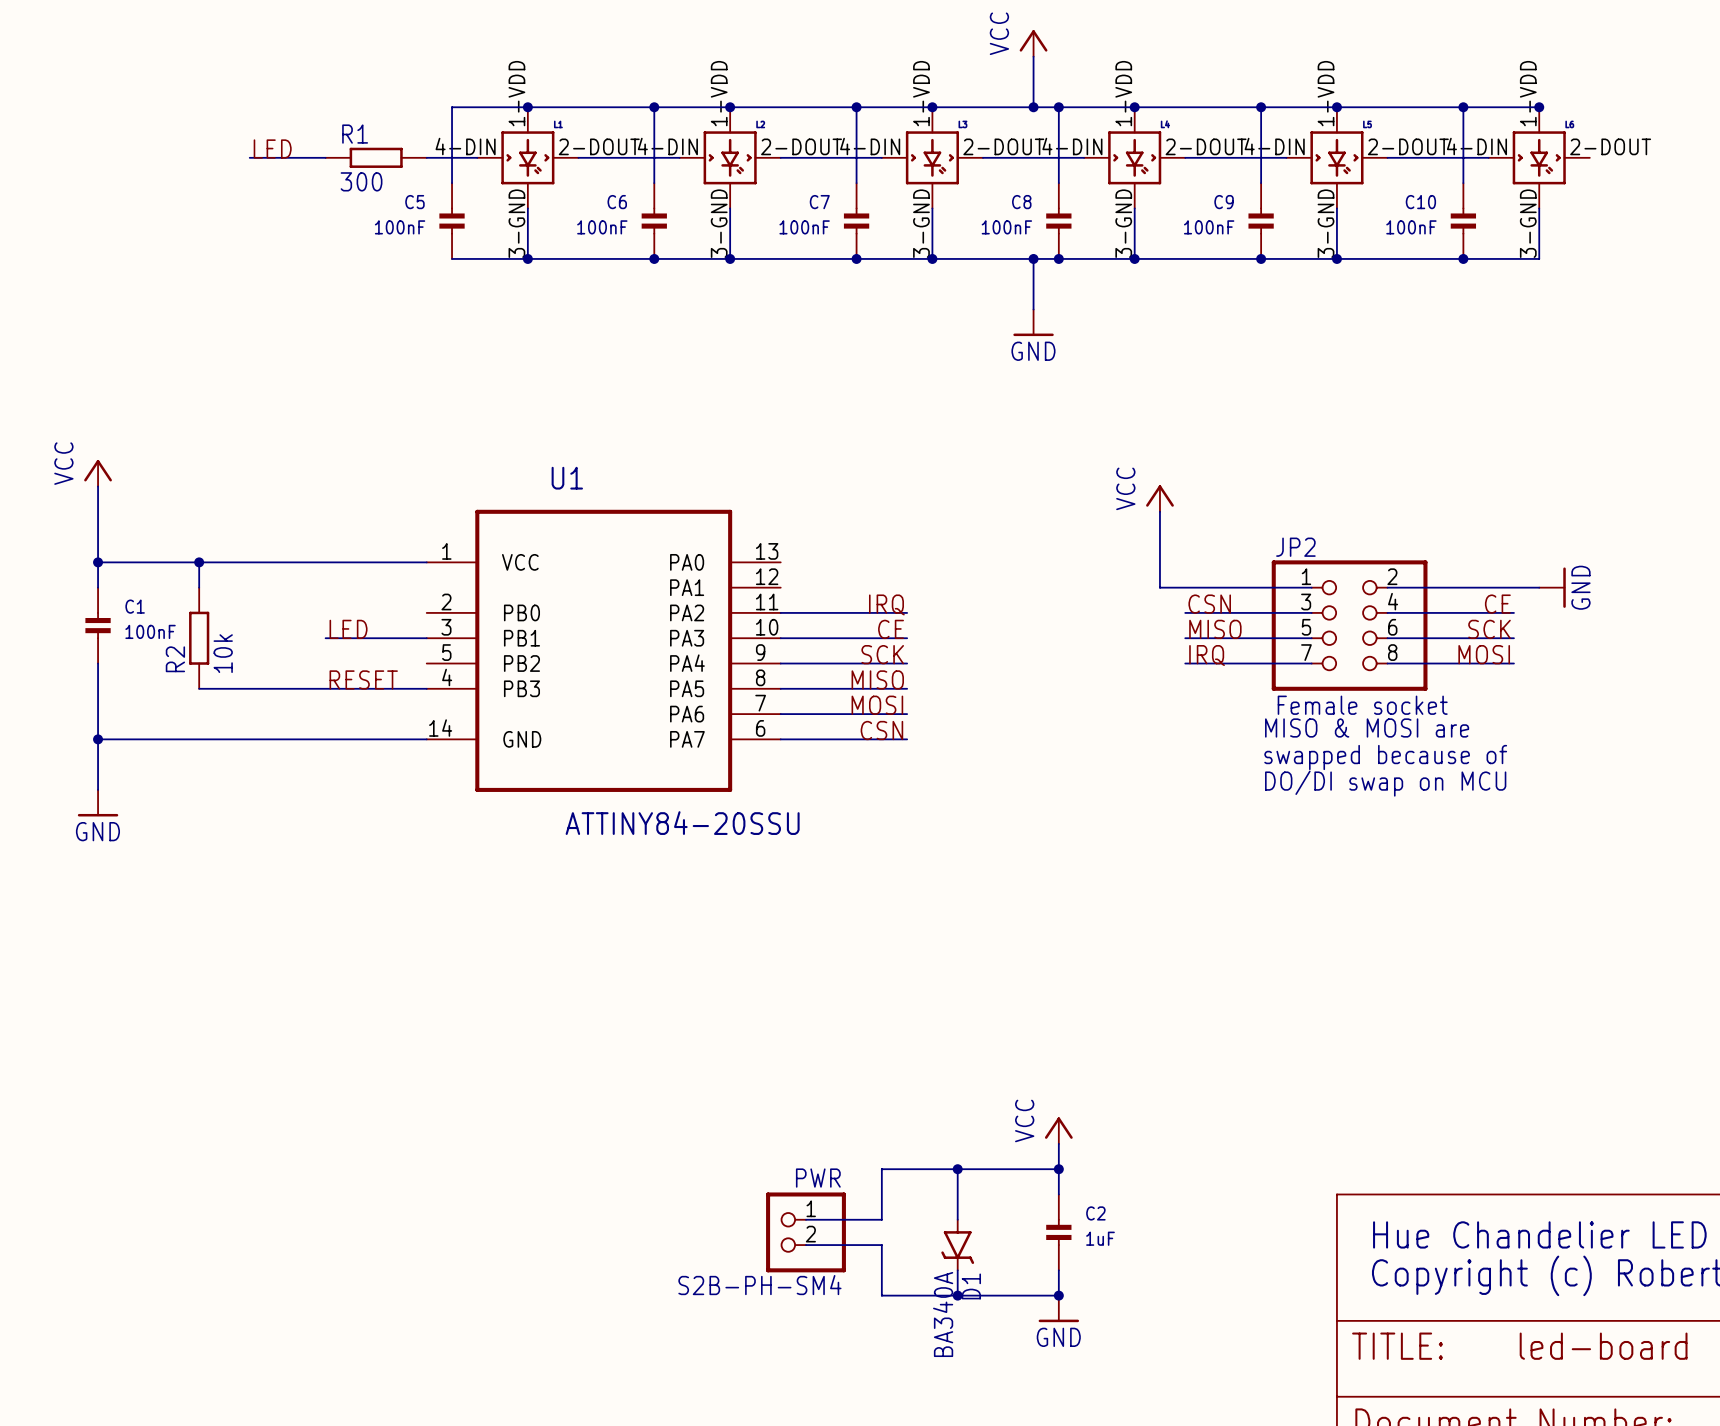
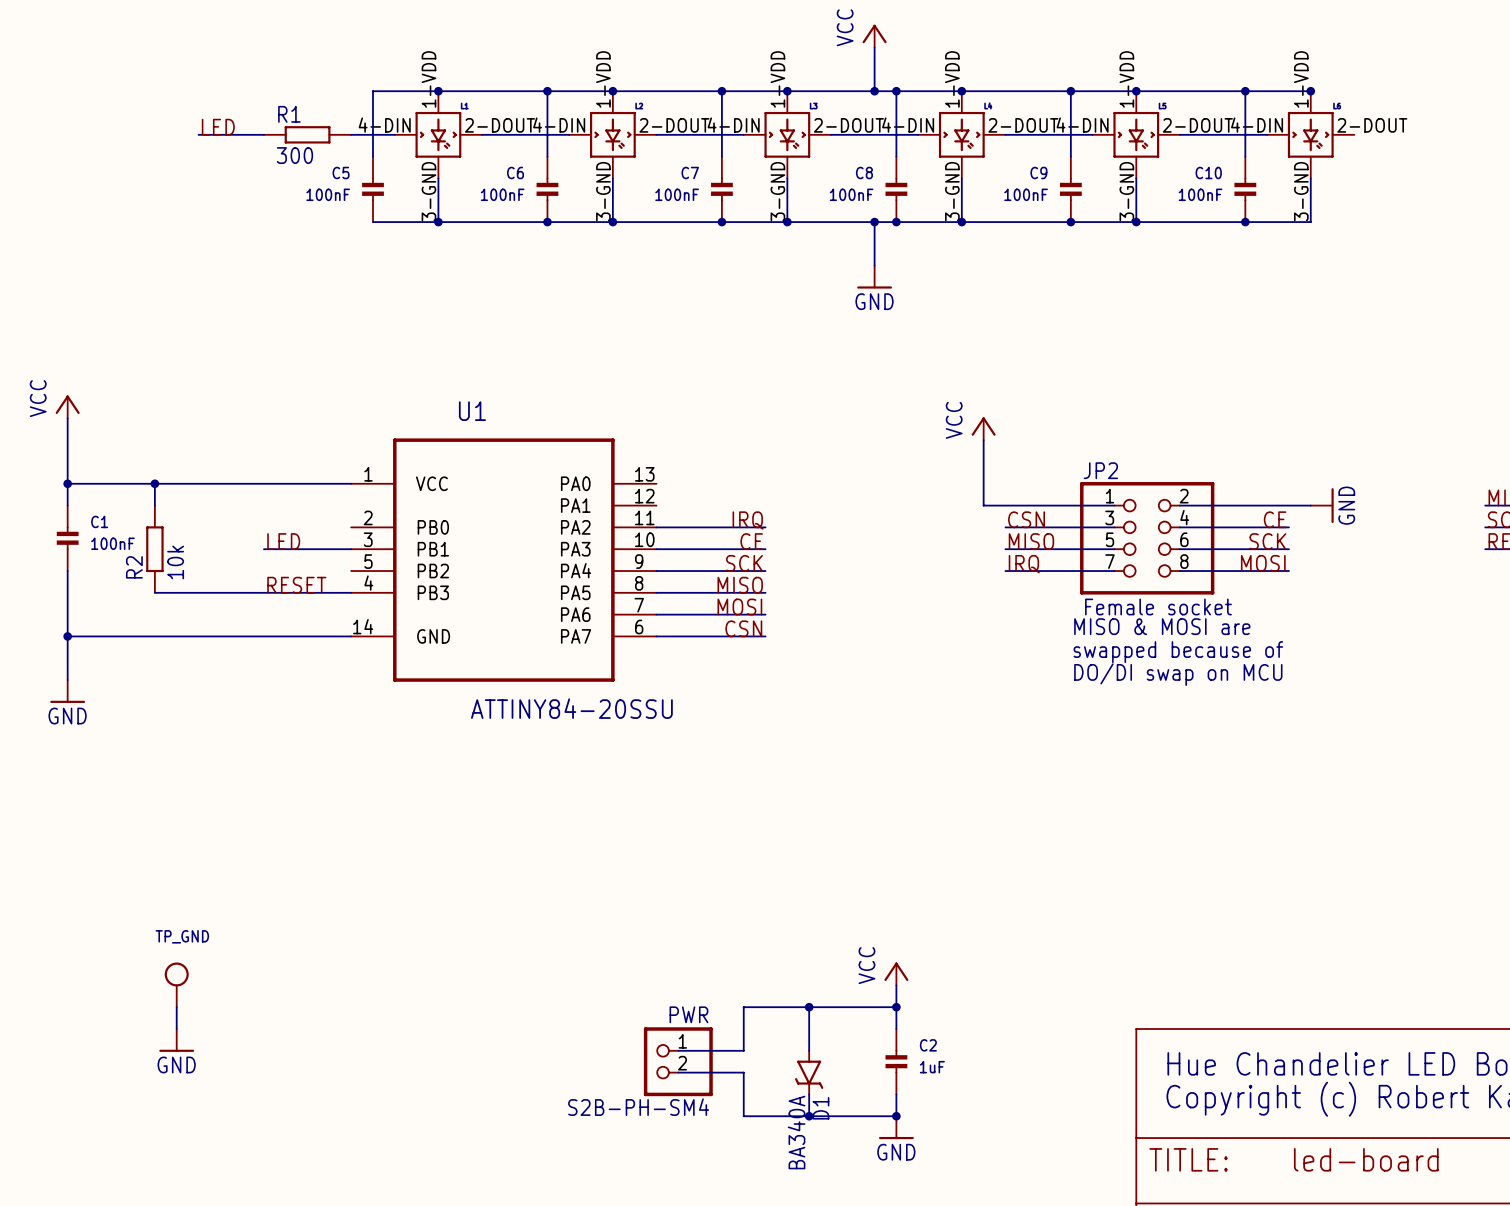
TP_GND: none -> (176, 984)
wire: none -> (176, 1007) (176, 1029)
power symbol: none -> GND (176, 1040)

